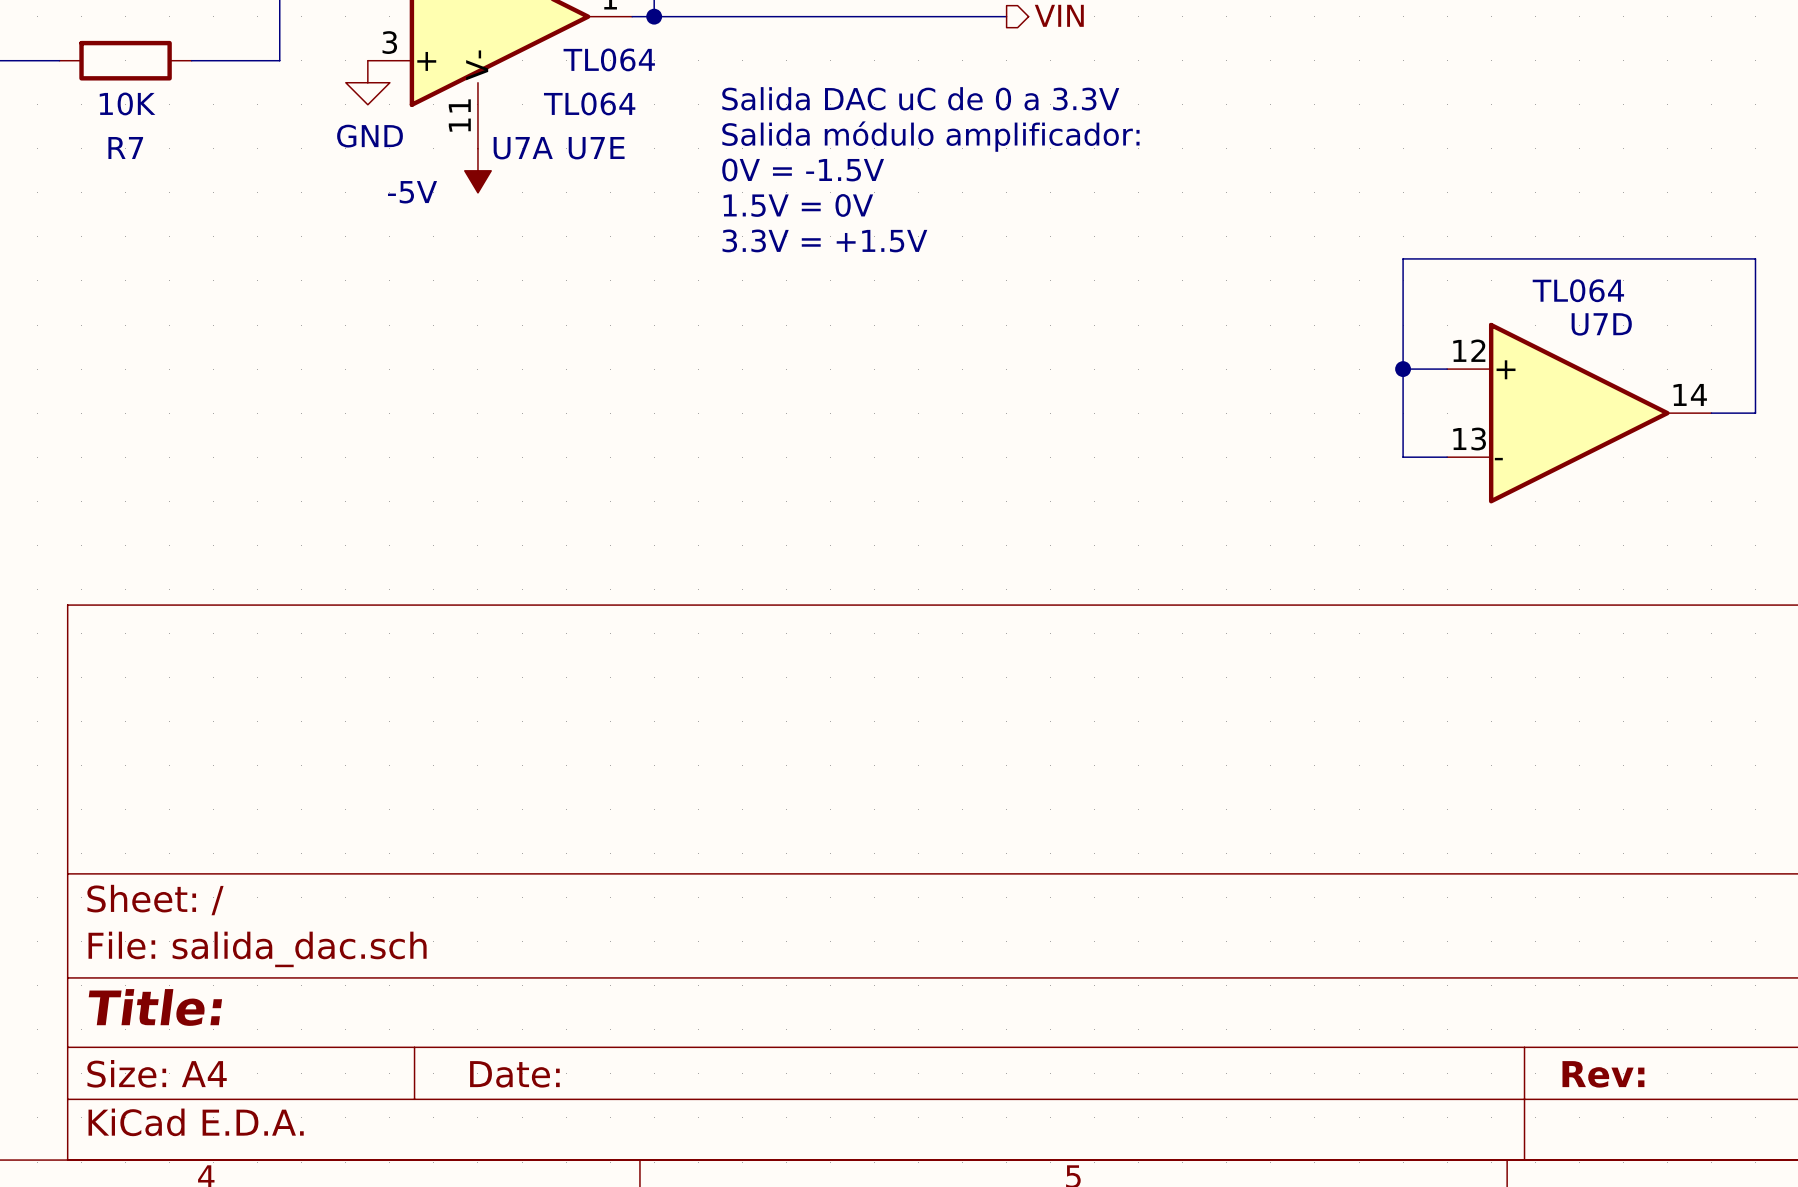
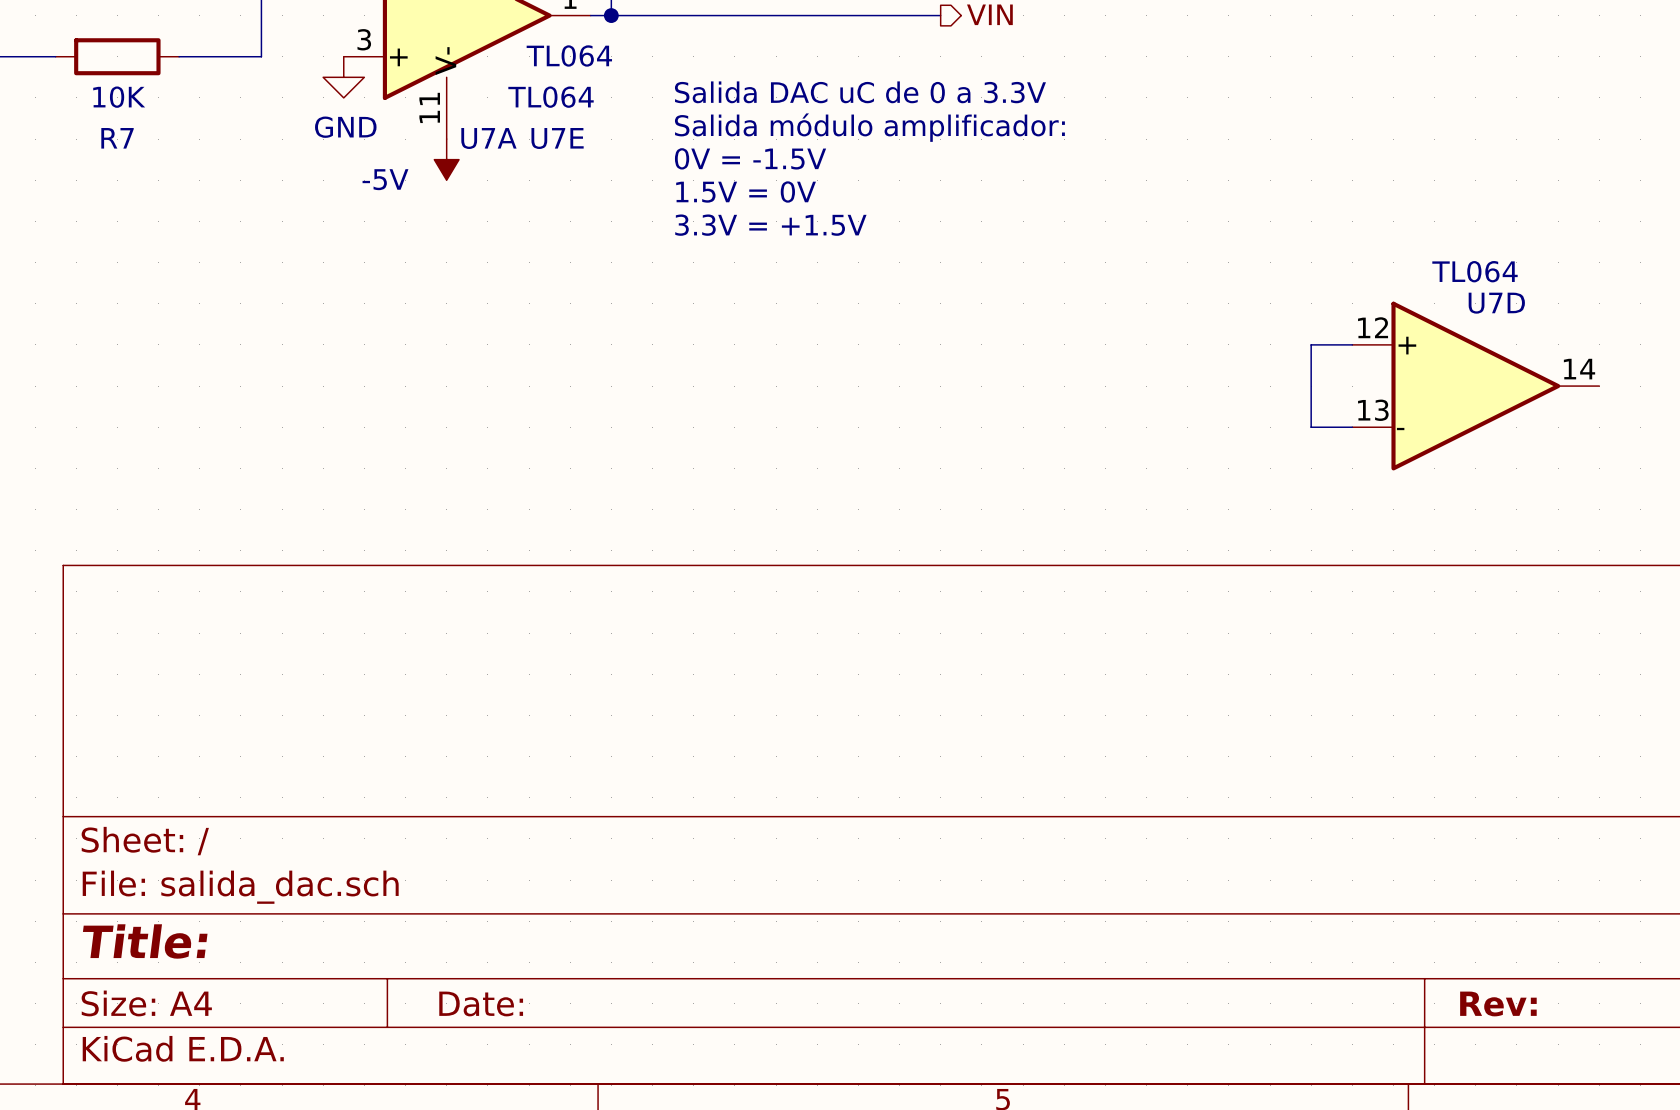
wire: (1403, 369) (1403, 258) (1755, 258) (1755, 413) (1711, 413) -> none
junction: (1403, 369) -> none

